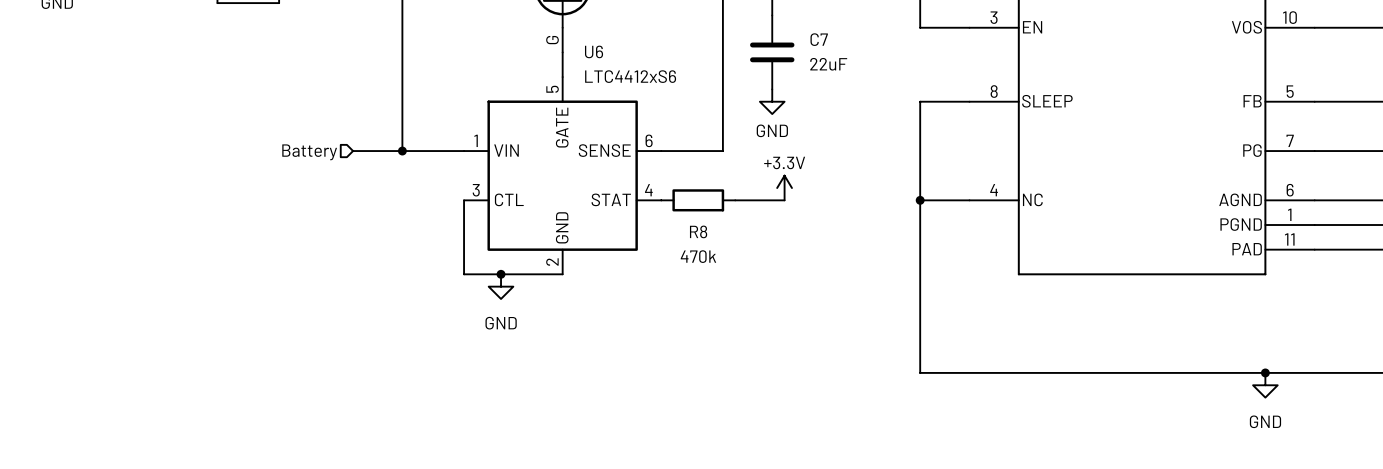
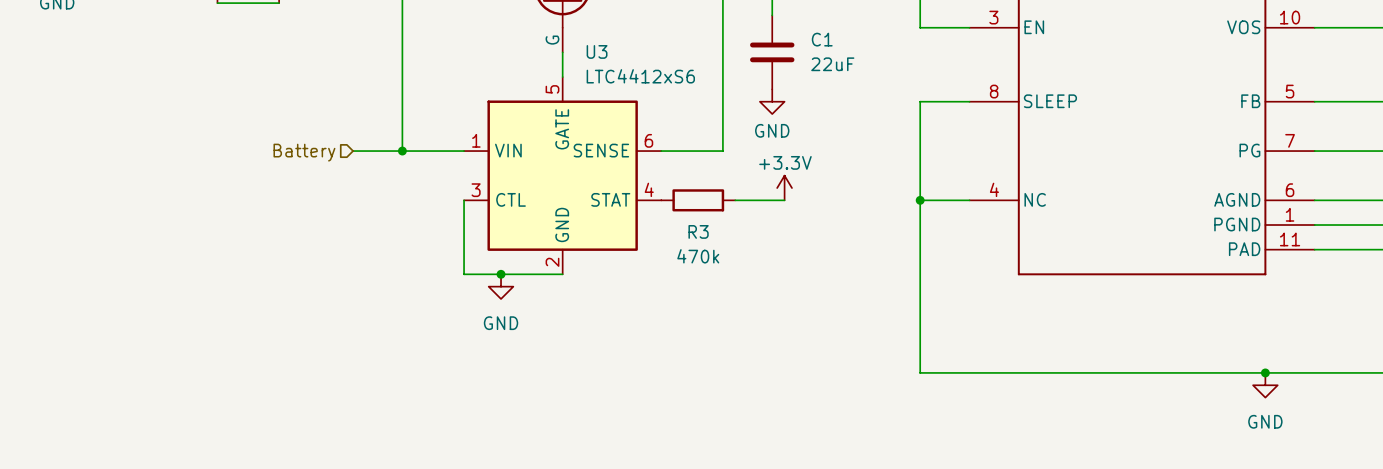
C7 name: C7 (819, 39) -> C1 (822, 39)
U6 name: U6 (594, 51) -> U3 (597, 51)
R8 name: R8 (698, 231) -> R3 (698, 231)

